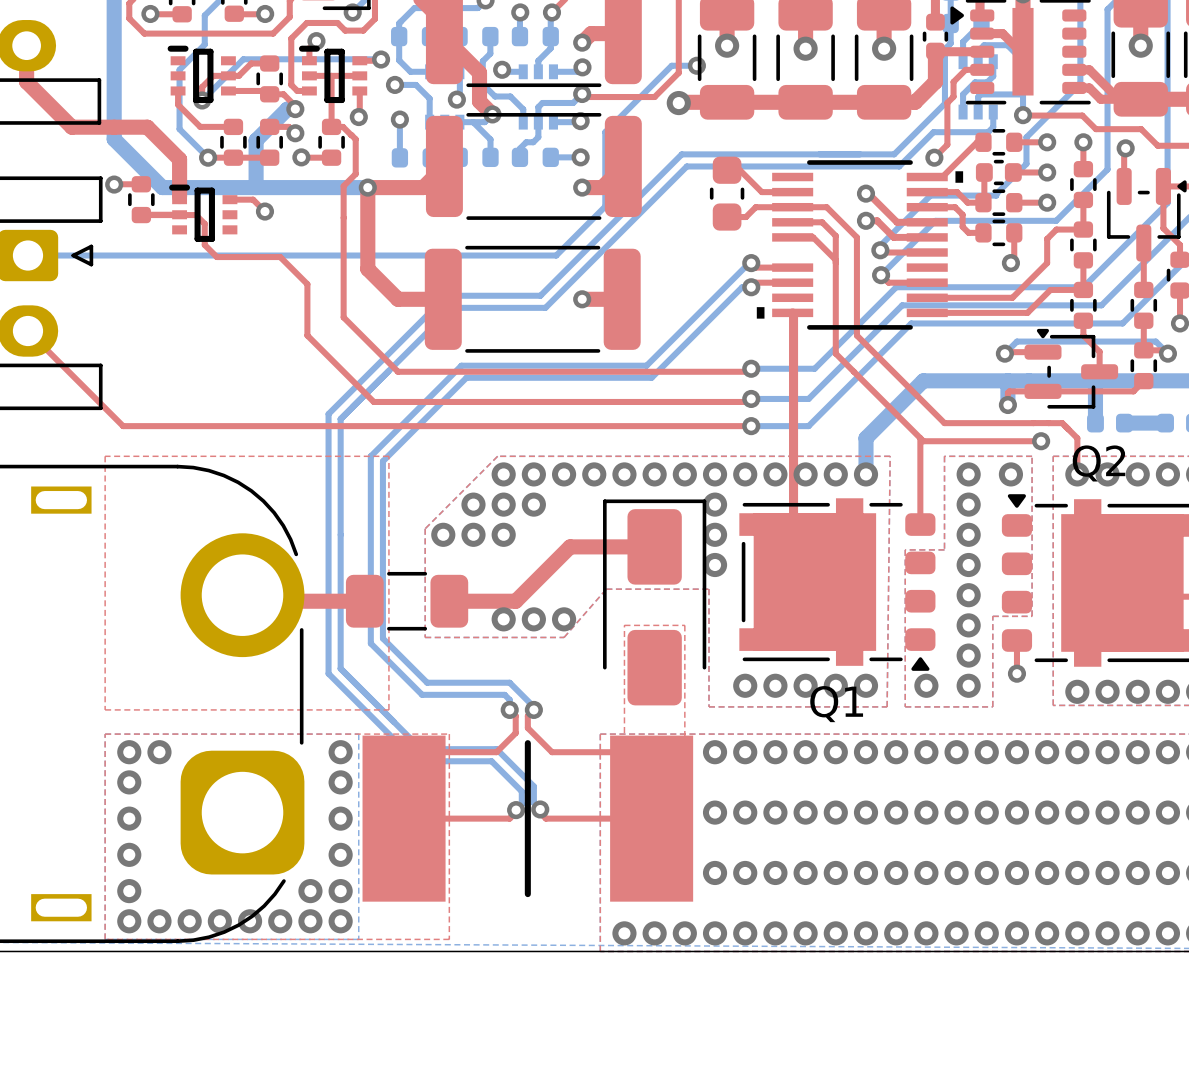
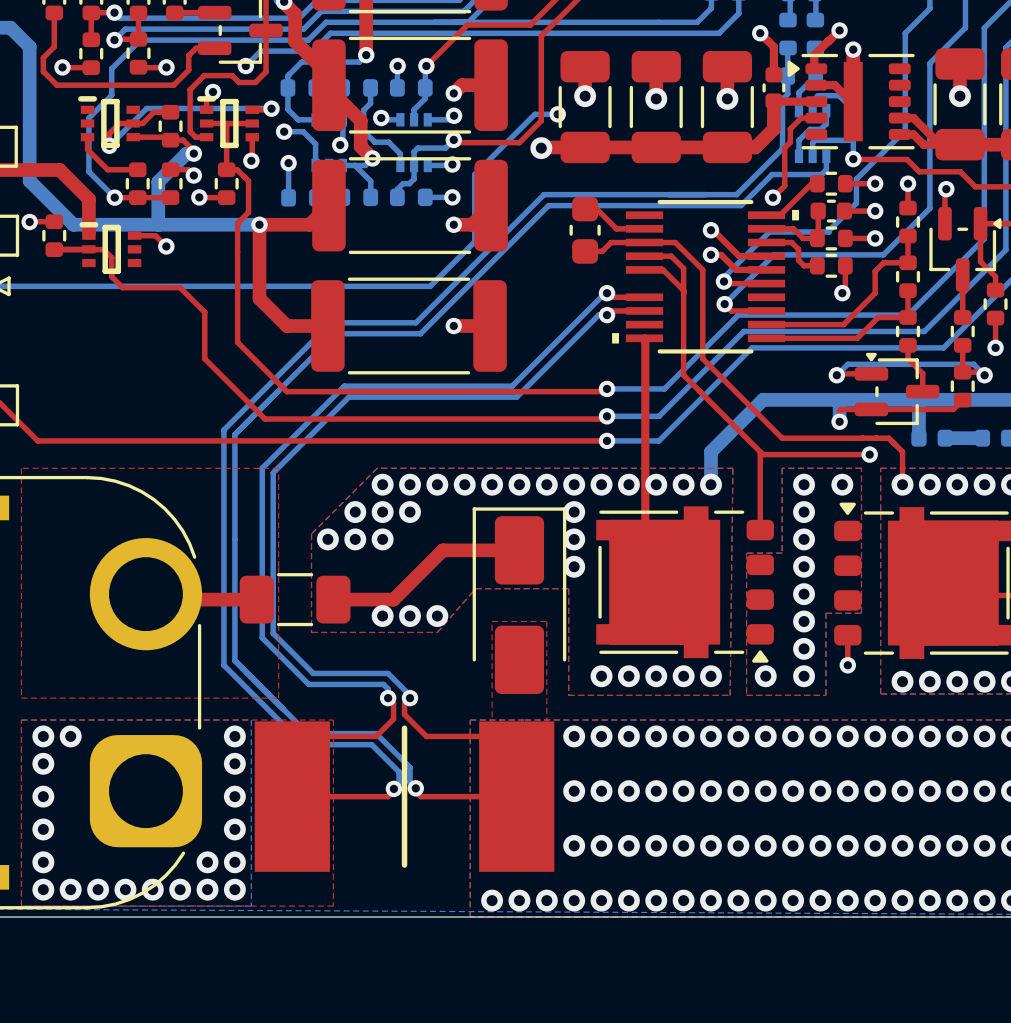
Q2 name: Q2 (1099, 463) -> none
Q1 name: Q1 (836, 704) -> none

